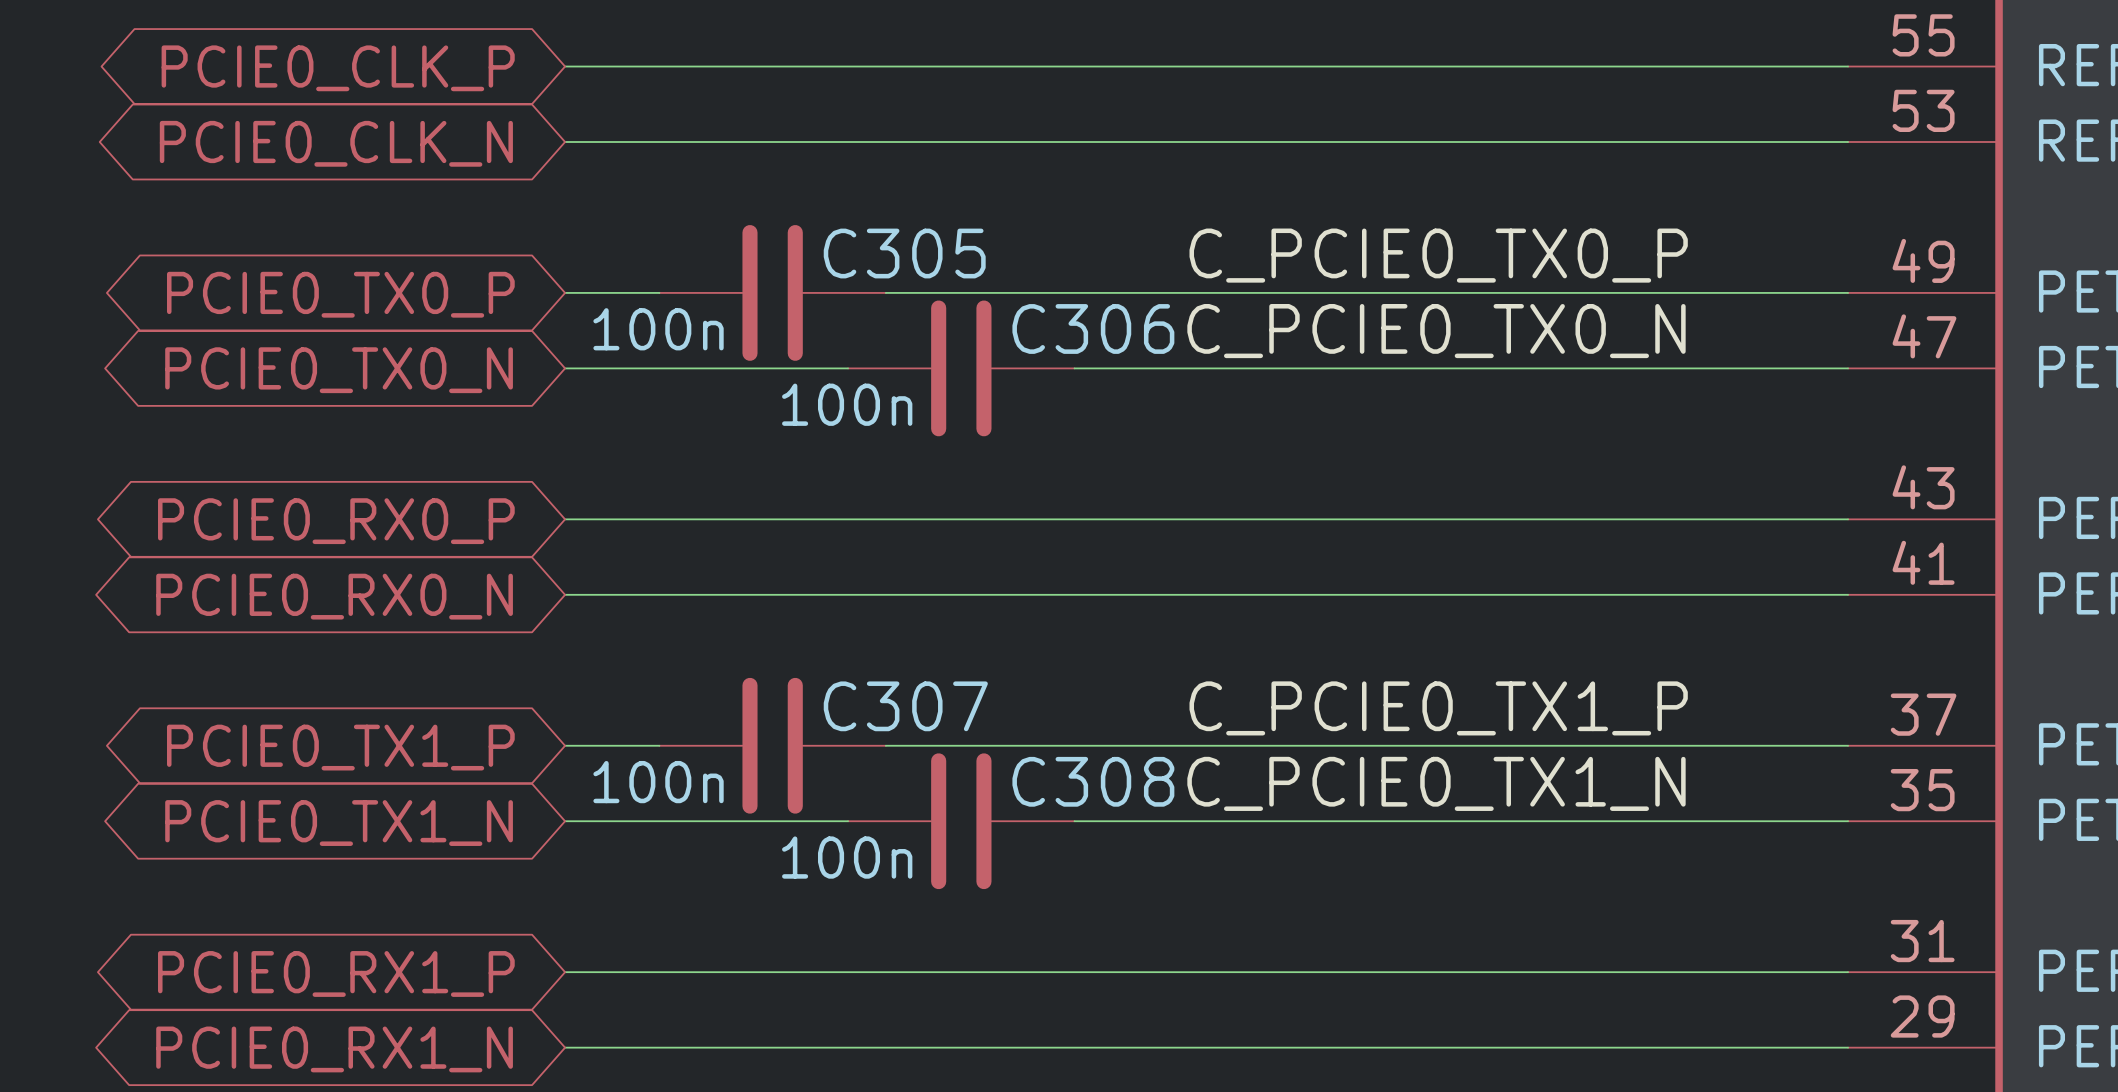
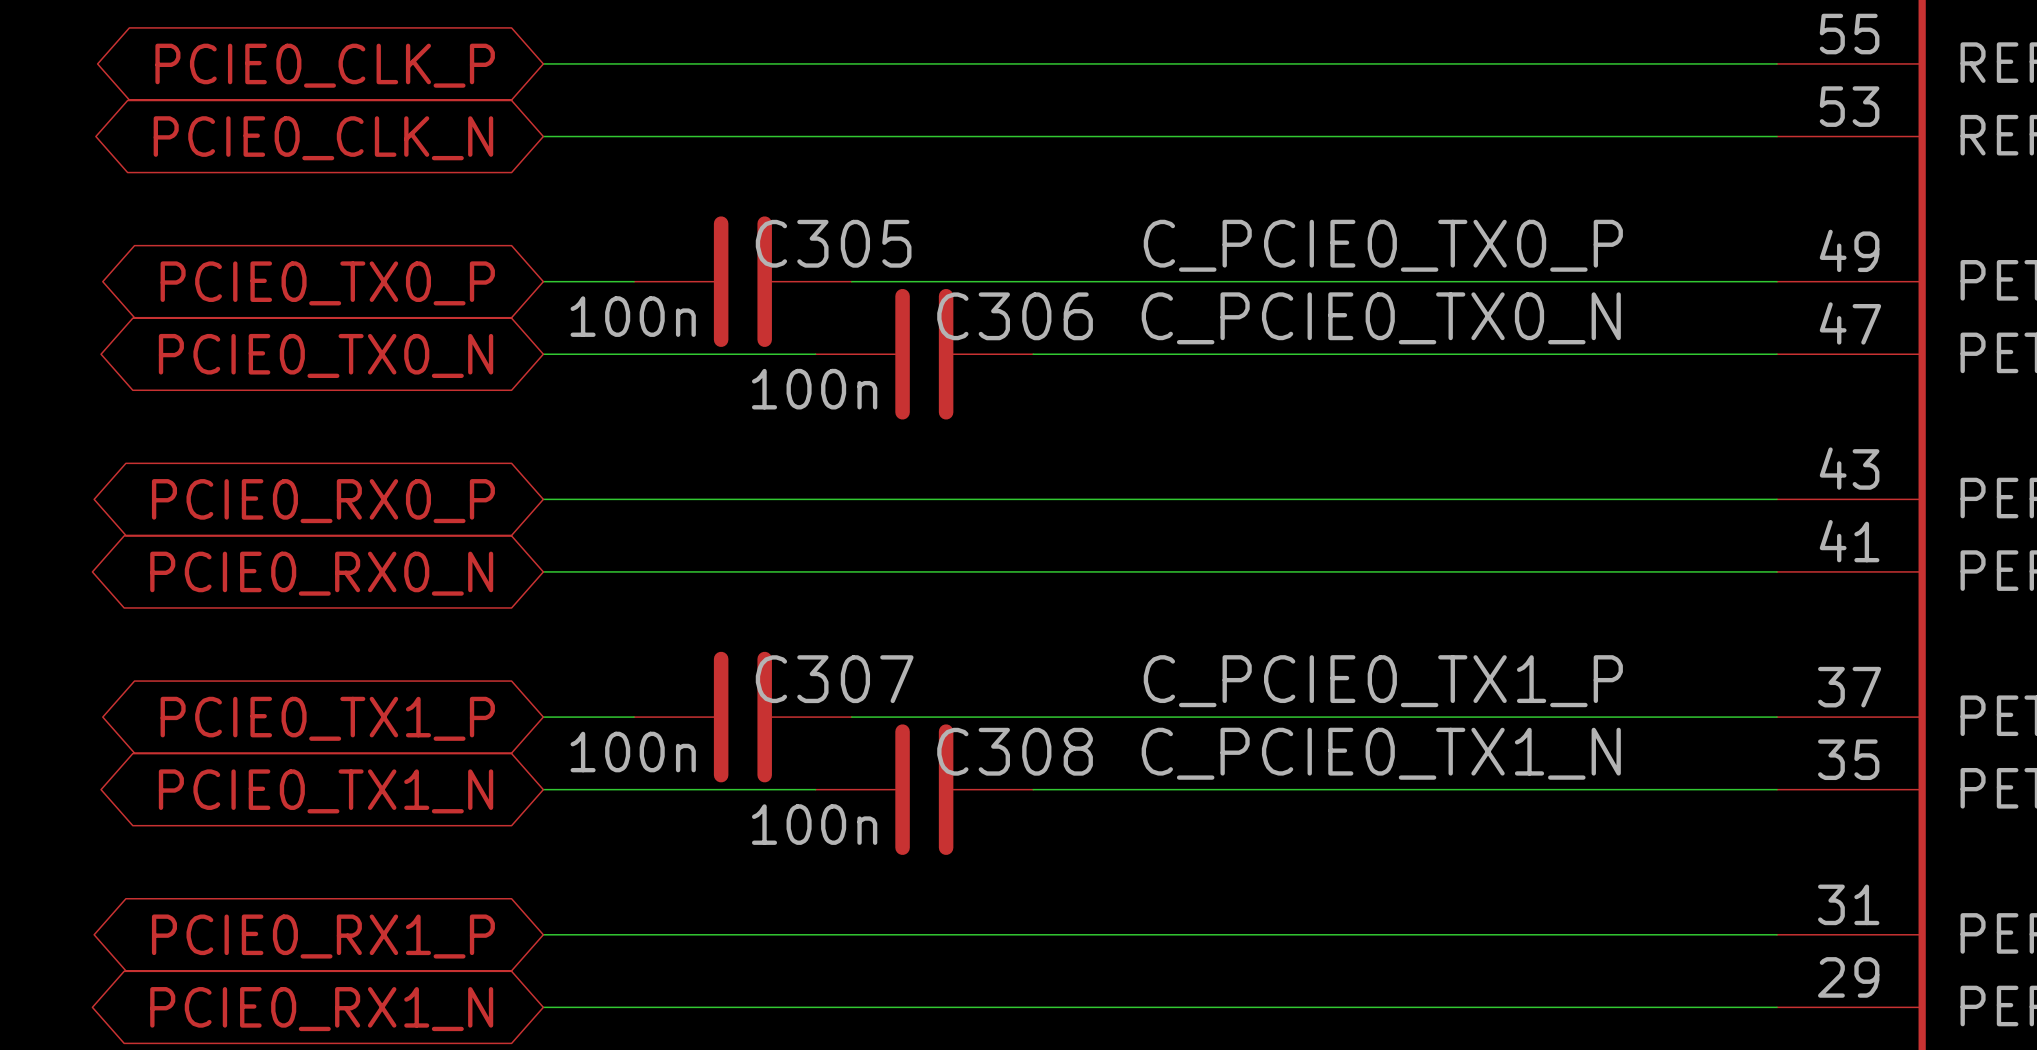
C305 name position: C305 (904, 253) -> C305 (833, 243)
C306 name position: C306 (1093, 328) -> C306 (1015, 316)
C307 name position: C307 (905, 706) -> C307 (834, 679)
C308 name position: C308 (1093, 781) -> C308 (1015, 751)

